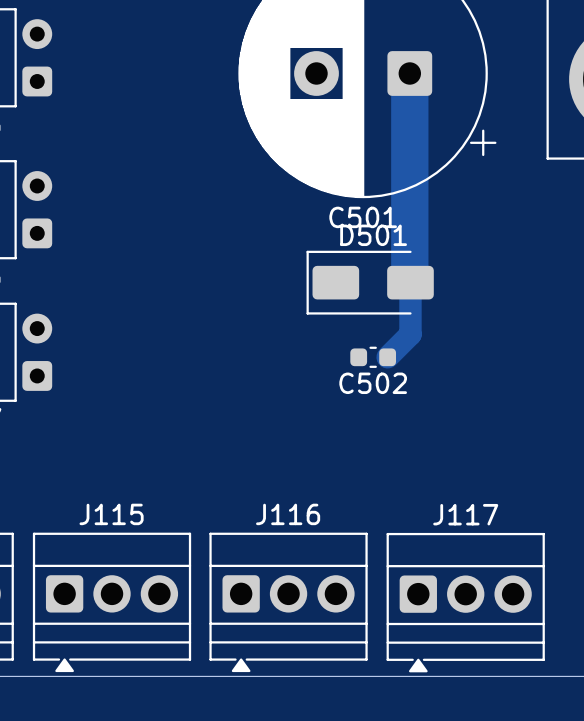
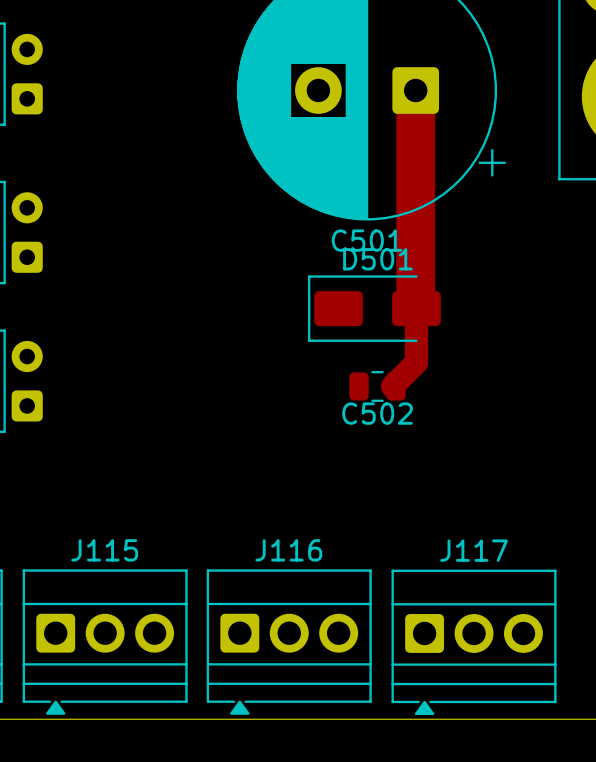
C502 footprint: [350, 346, 397, 368] -> [349, 371, 406, 402]

